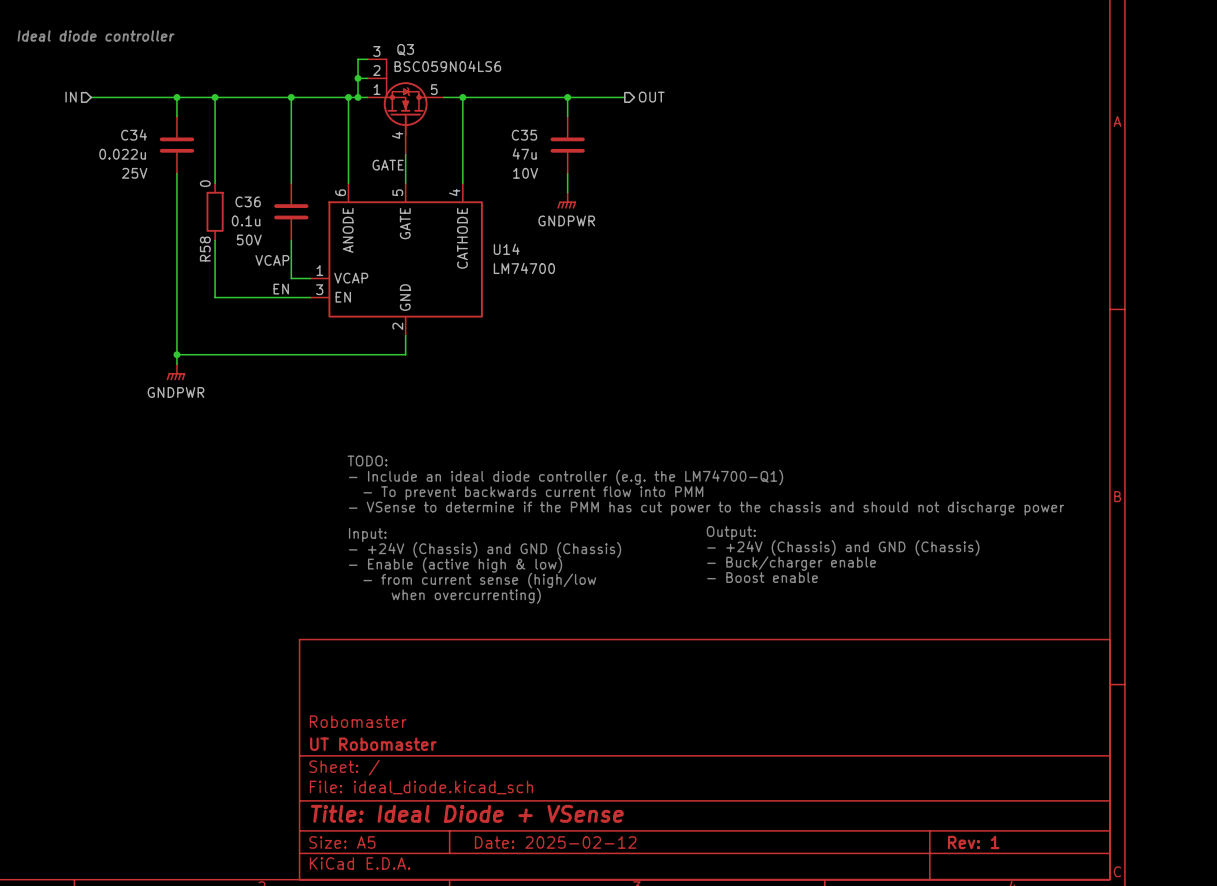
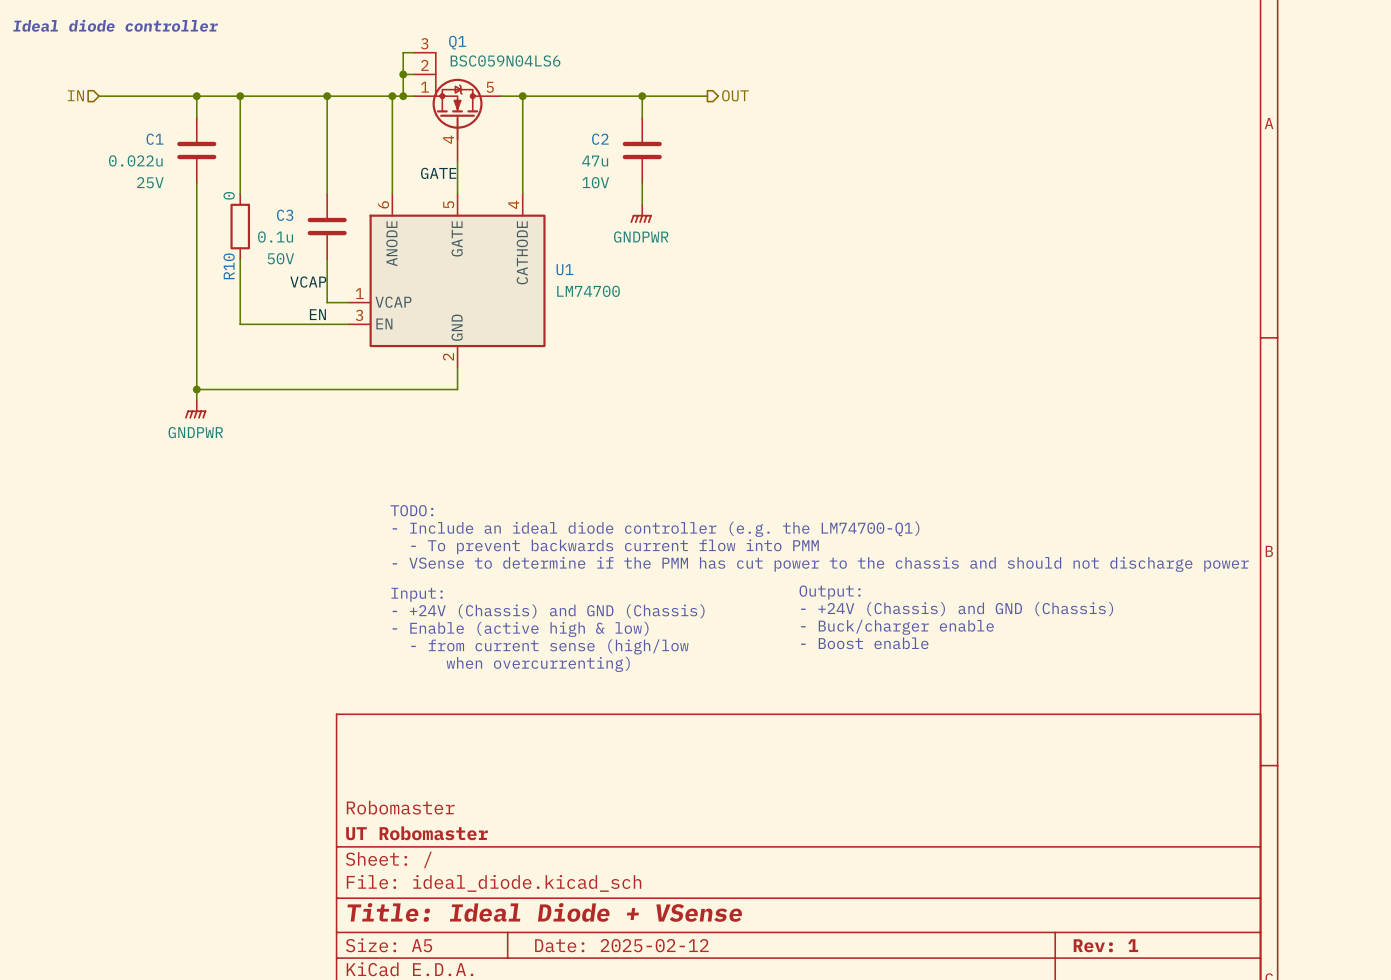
Q3 name: Q3 (405, 49) -> Q1 (457, 42)
C34 name: C34 (134, 134) -> C1 (155, 139)
C35 name: C35 (524, 135) -> C2 (600, 139)
C36 name: C36 (248, 201) -> C3 (285, 215)
R58 name: R58 (205, 249) -> R10 (229, 266)
U14 name: U14 (506, 249) -> U1 (564, 269)

